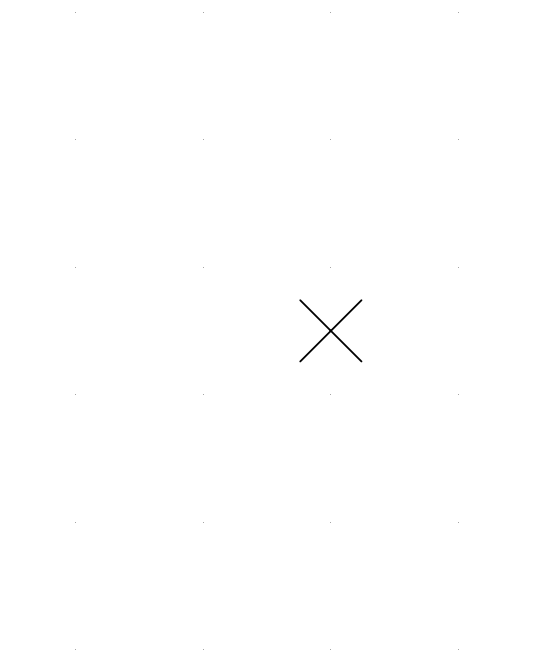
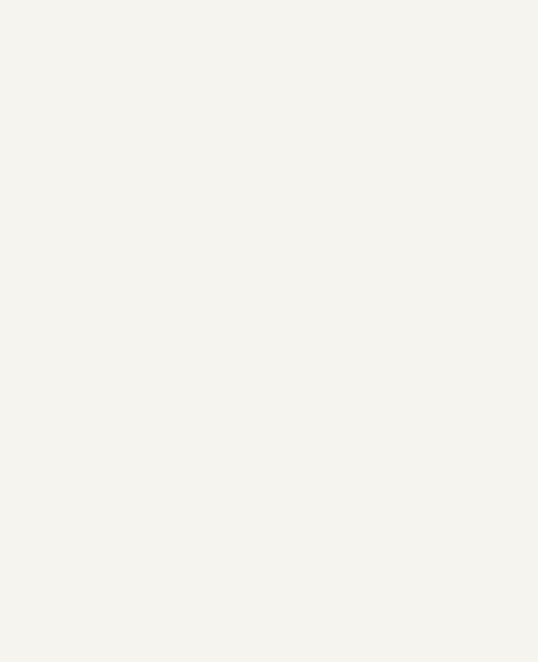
no-connect mark: (330, 330) -> none

